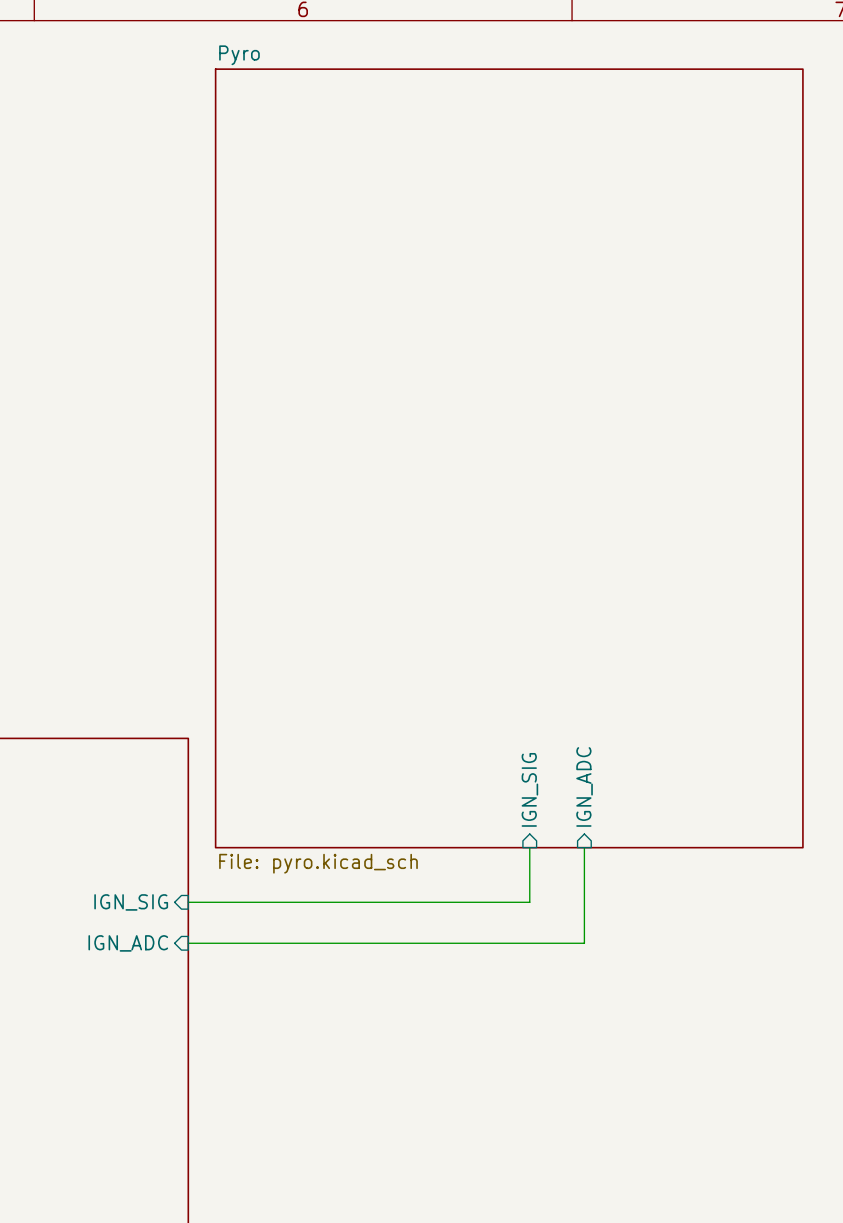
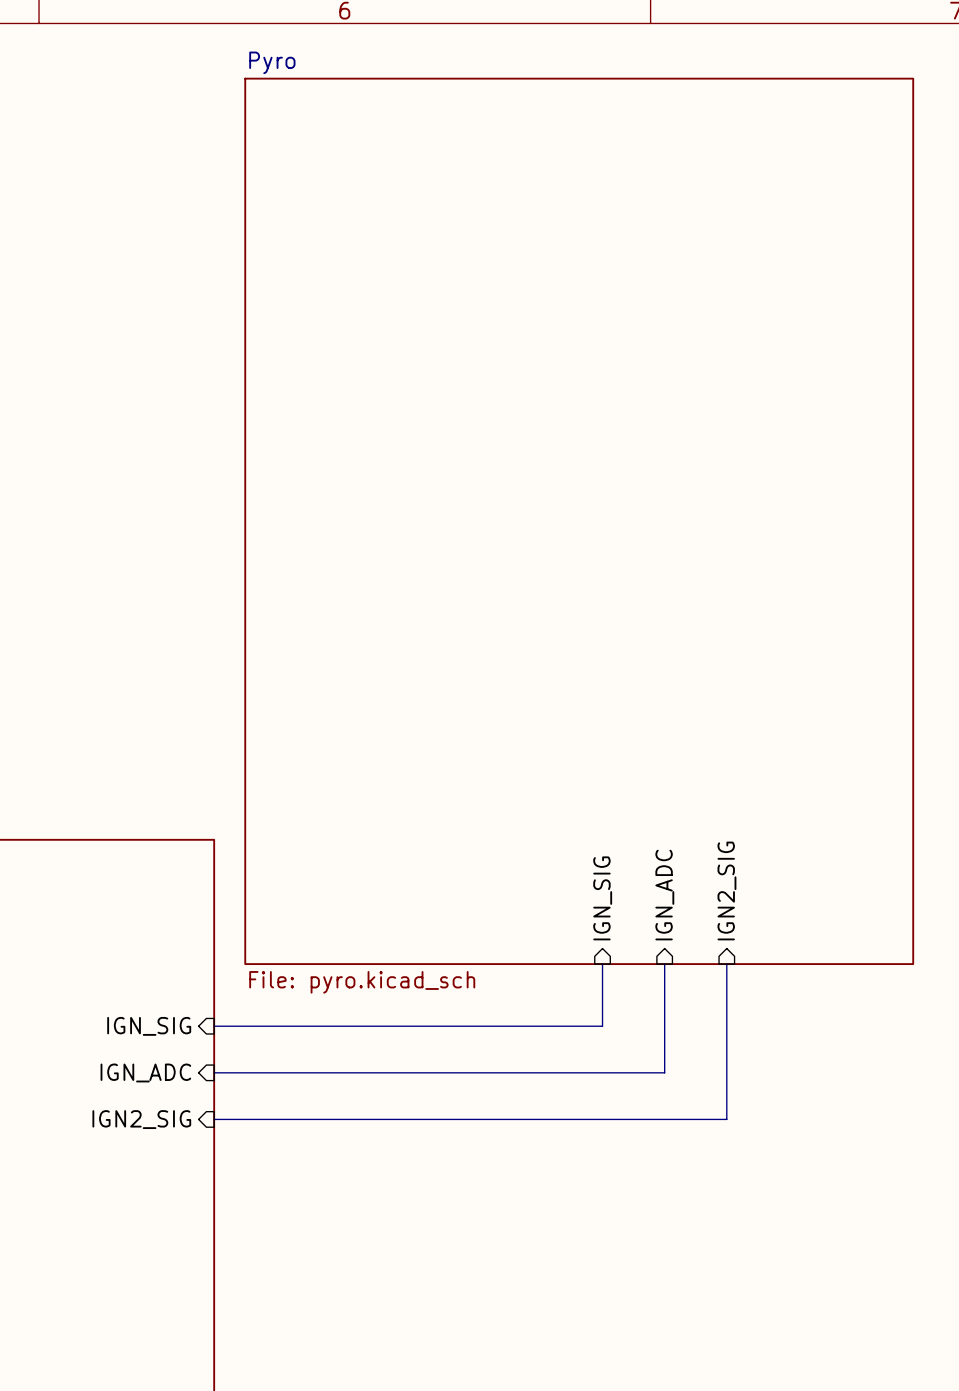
sheet pin: none -> IGN2_SIG (726, 890)
wire: none -> (726, 964) (726, 1119) (214, 1119)
sheet pin: none -> IGN2_SIG (141, 1119)

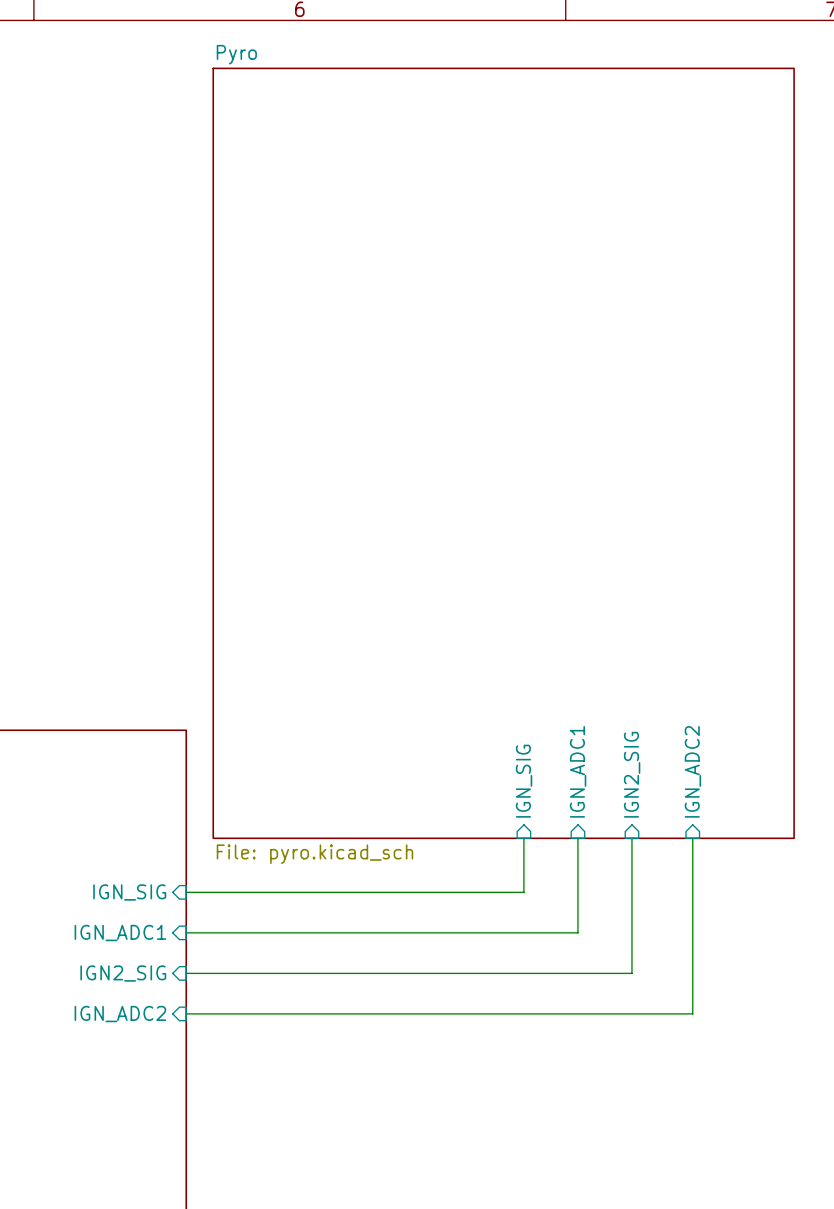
sheet pin: none -> IGN_ADC2 (692, 771)
sheet pin: IGN_ADC (664, 895) -> IGN_ADC1 (578, 771)
wire: none -> (692, 838) (692, 1013) (186, 1013)
sheet pin: IGN_ADC (145, 1072) -> IGN_ADC1 (120, 933)
sheet pin: none -> IGN_ADC2 (120, 1014)

